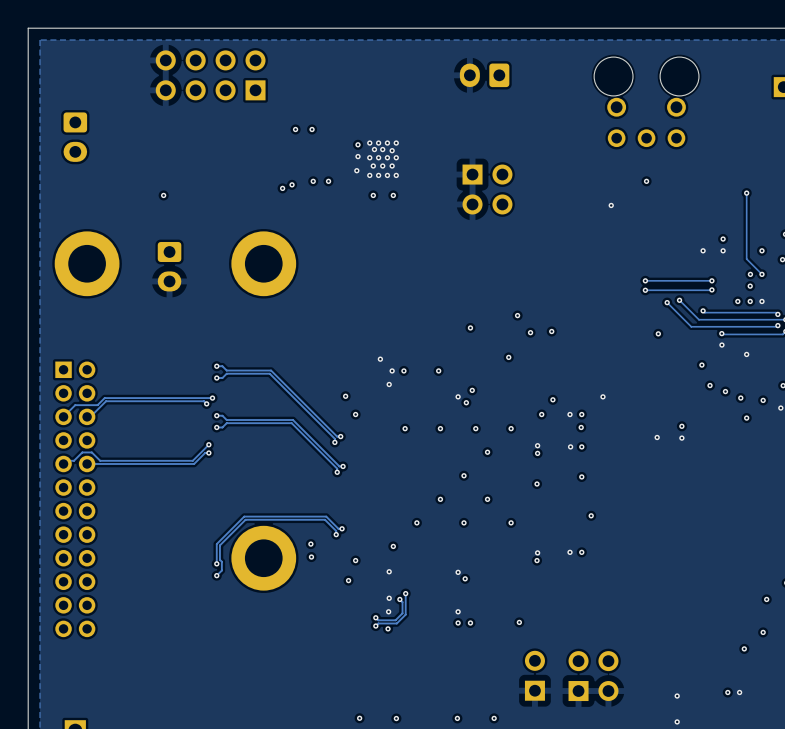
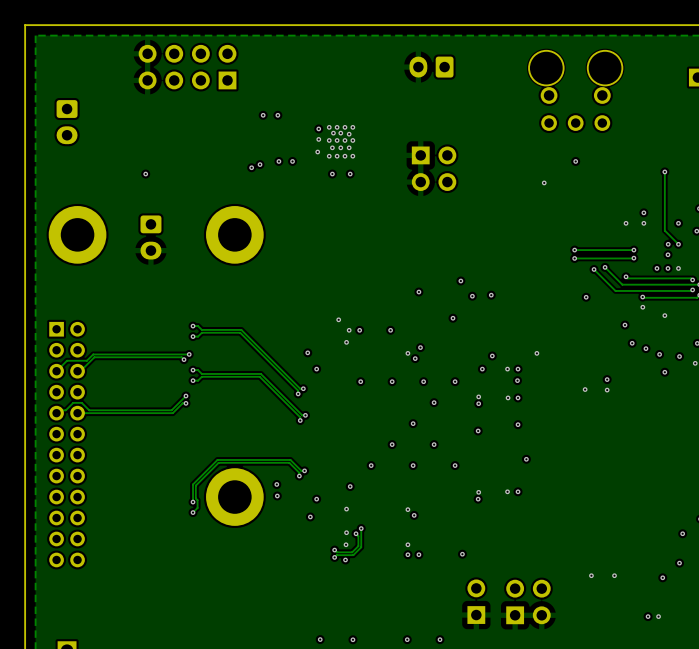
via: none -> (591, 575)
via: none -> (614, 575)
via: (677, 696) -> none
via: (677, 721) -> none

